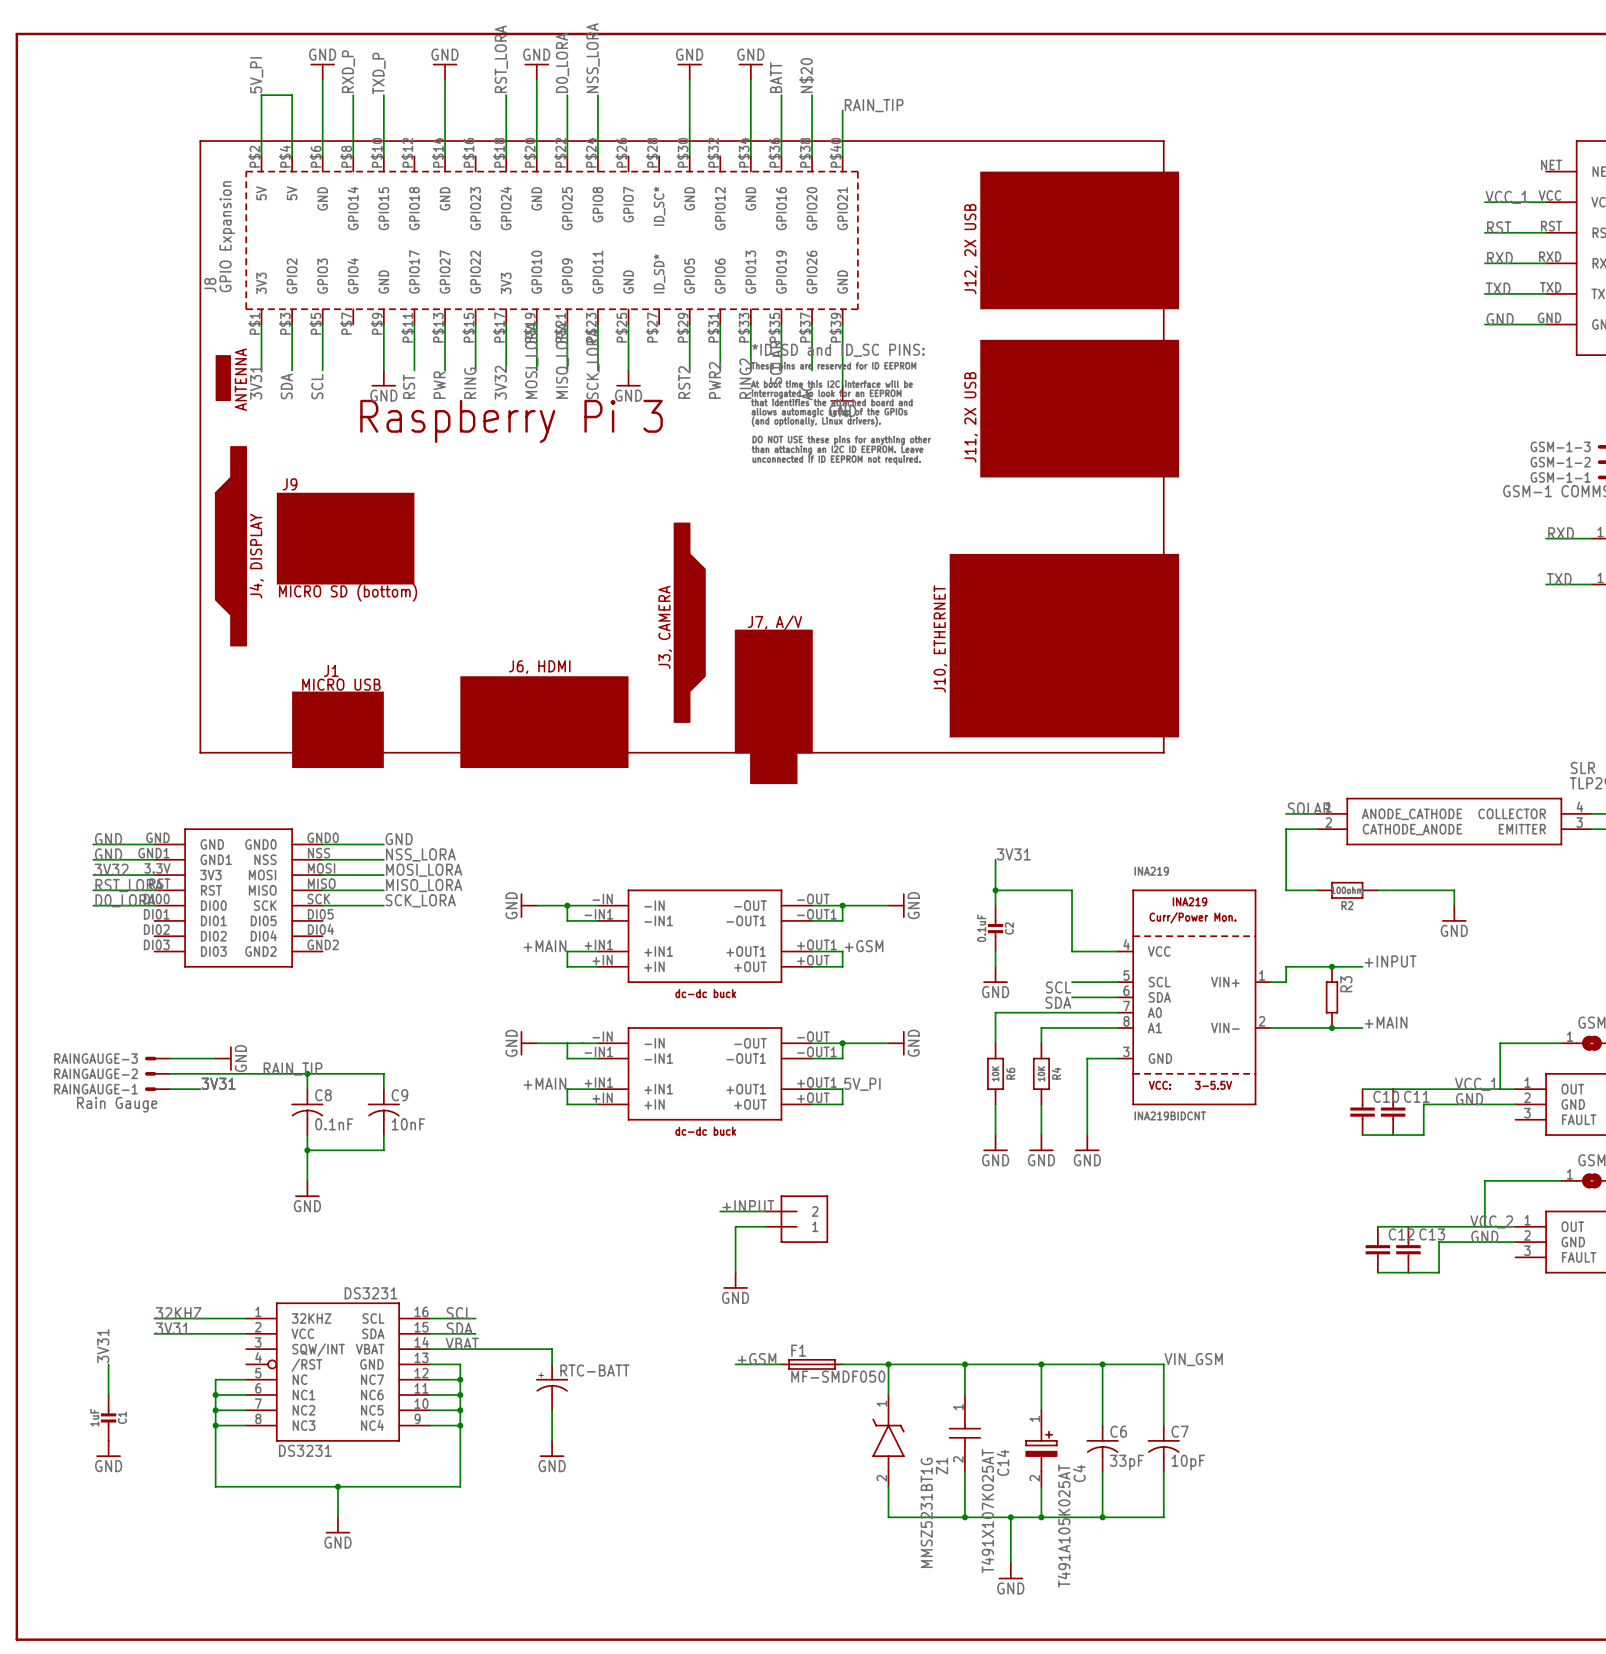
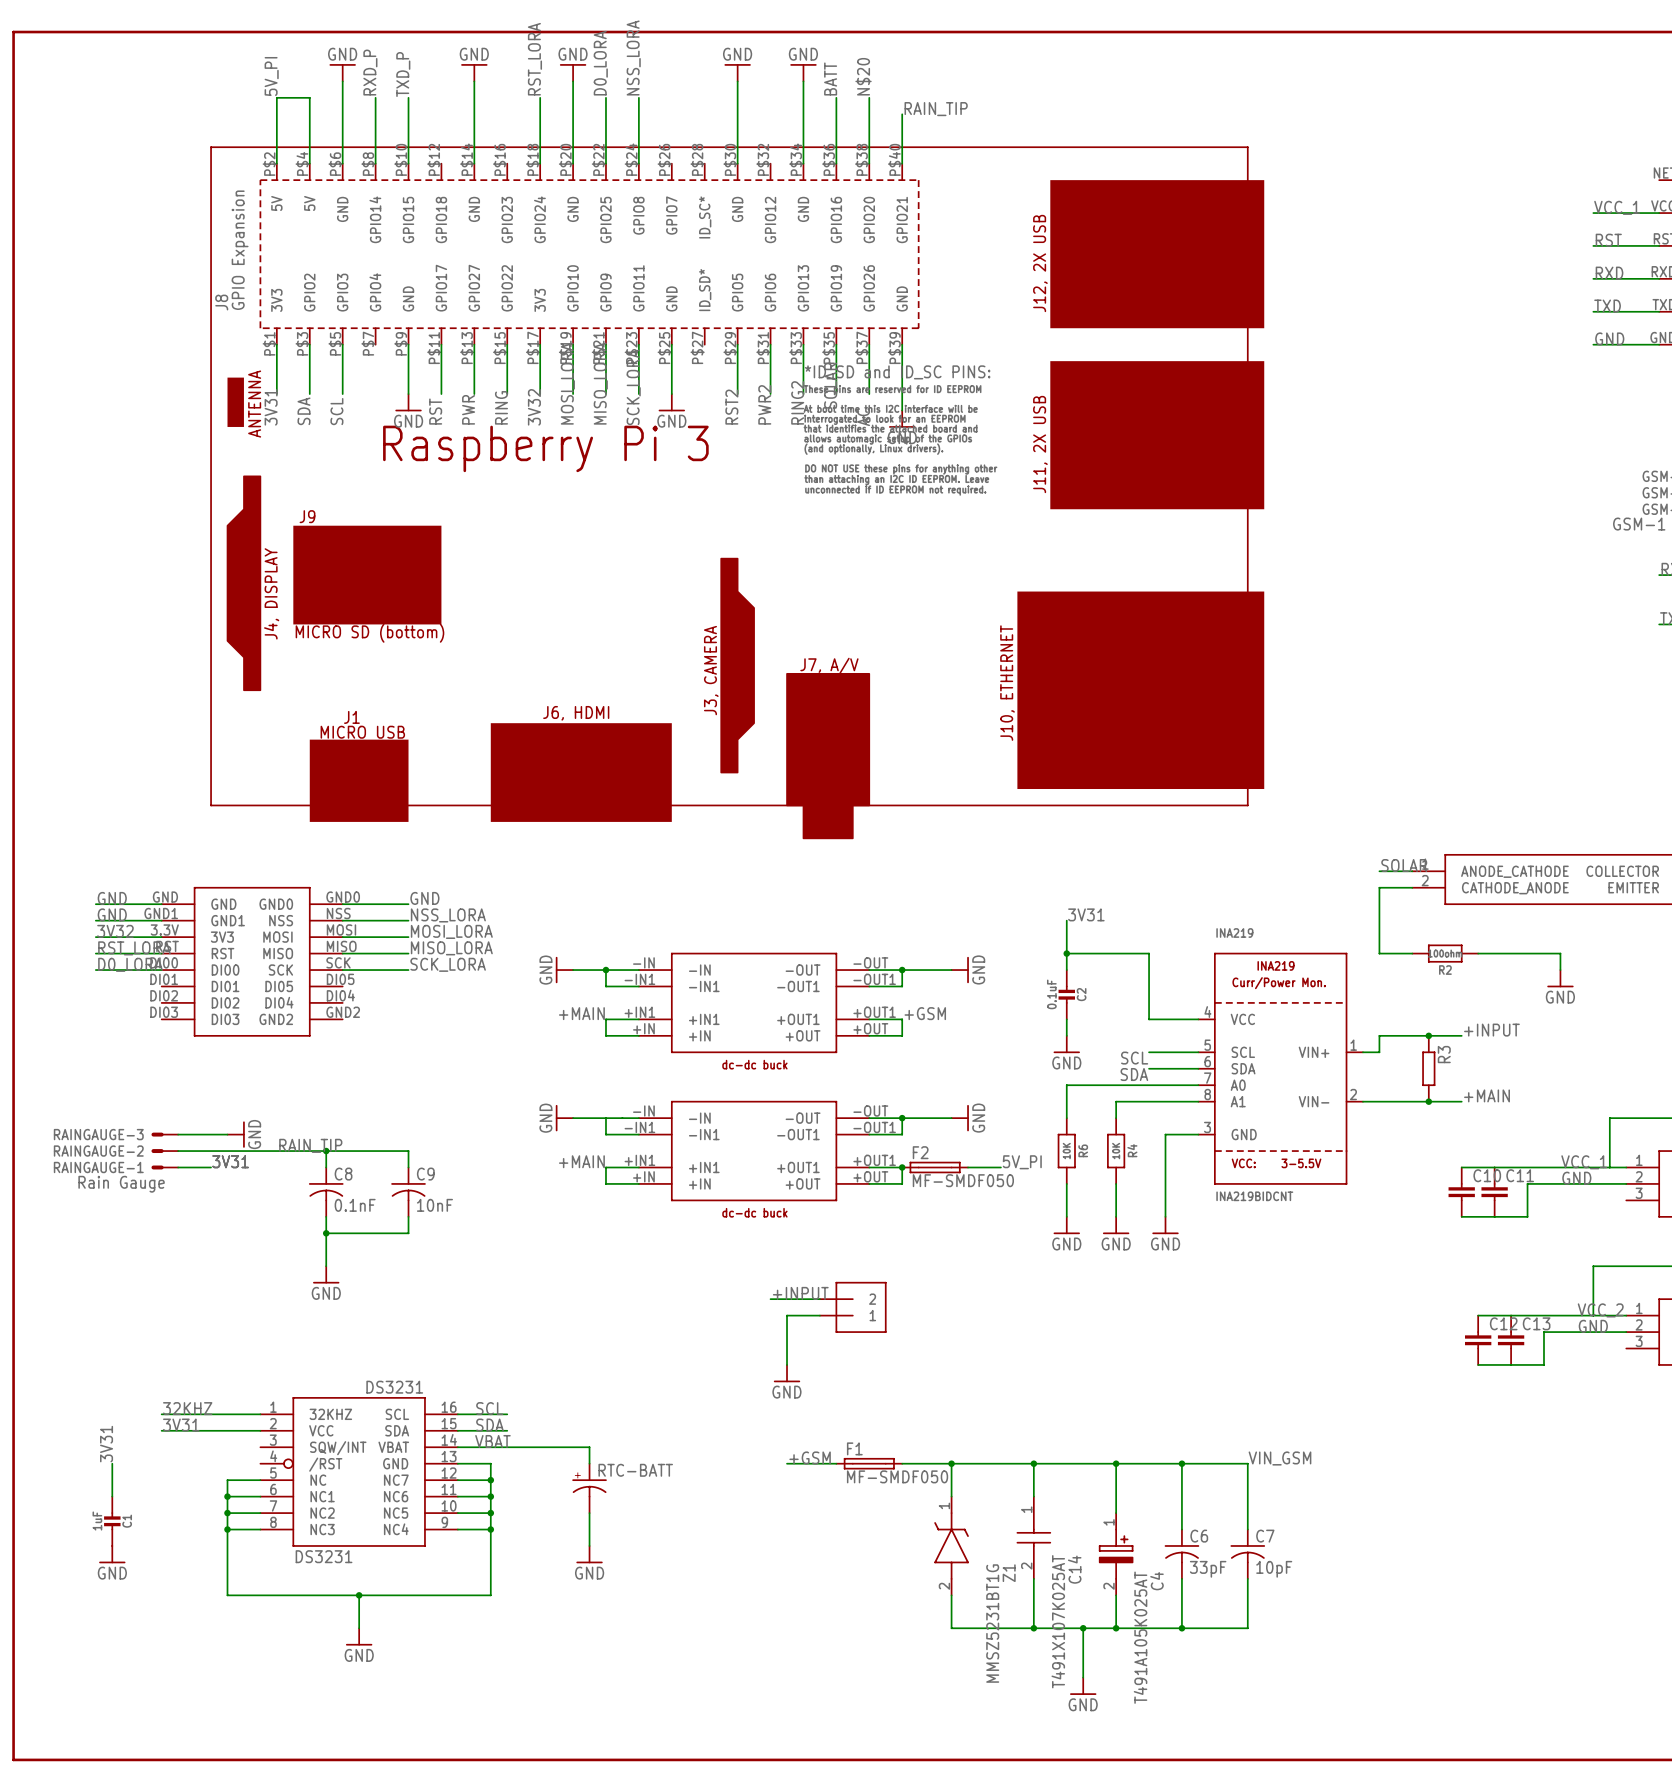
label position: 5V_PI (862, 1084) -> 5V_PI (1022, 1162)
junction: none -> (902, 1167)
F2: none -> MF-SMDF050 (935, 1167)
wire: none -> (968, 1167) (1000, 1167)

